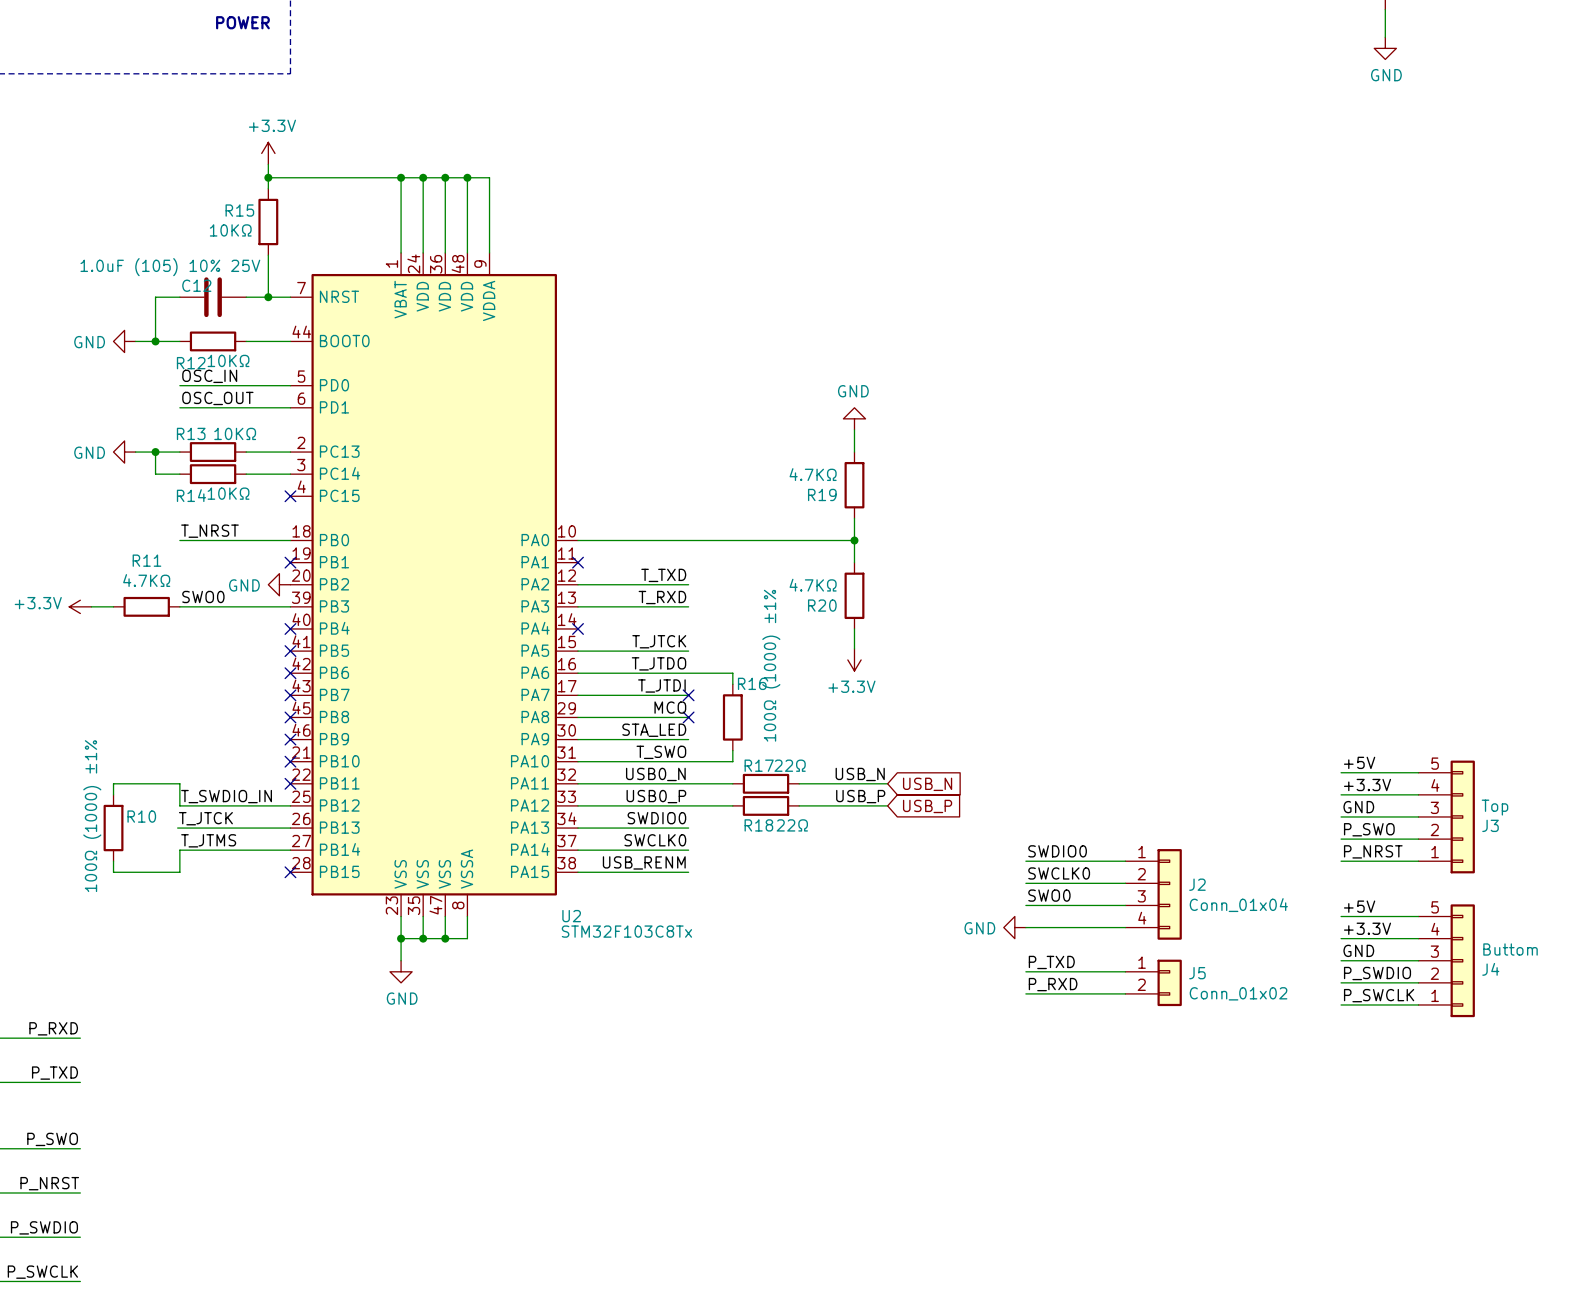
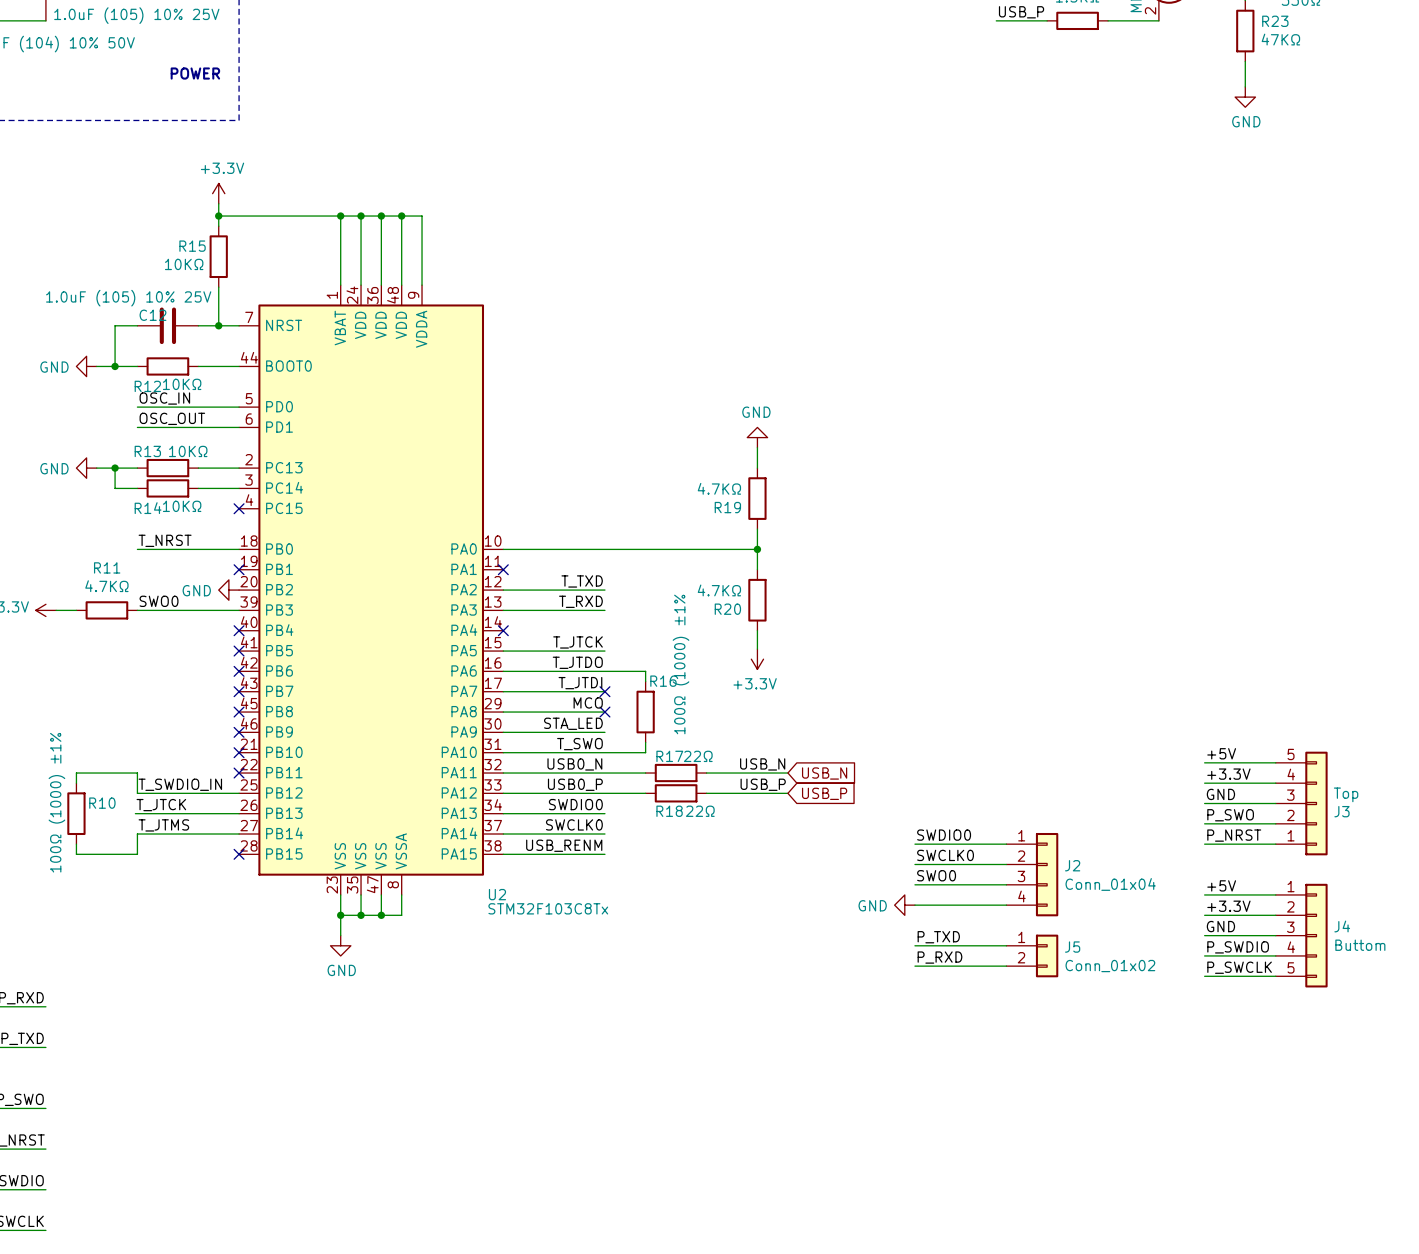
J4 flip: as is (1462, 960) -> up-down (1316, 935)

